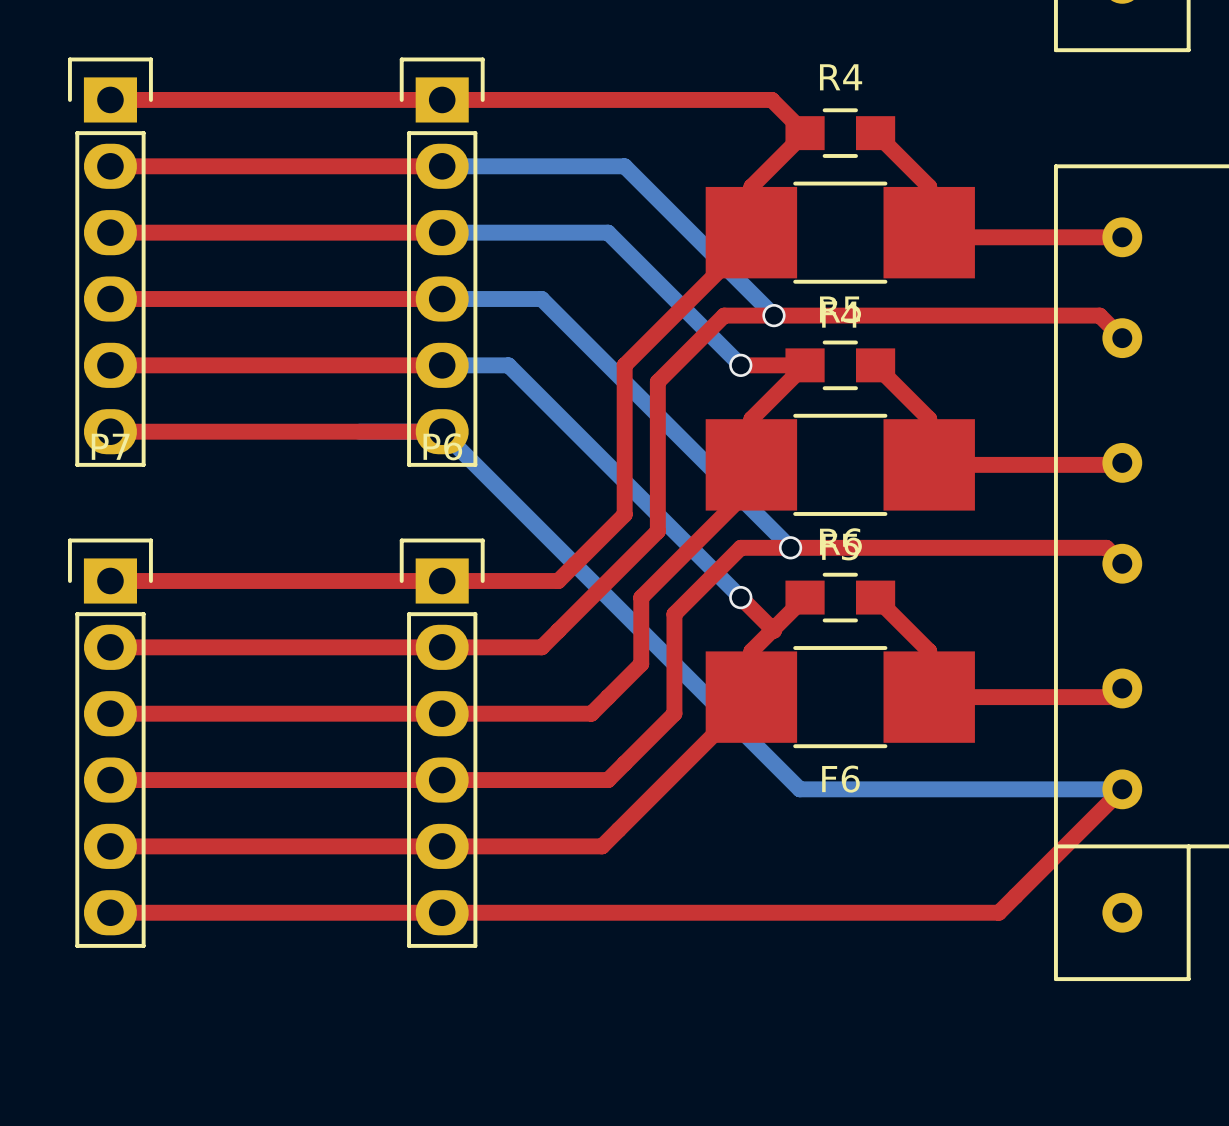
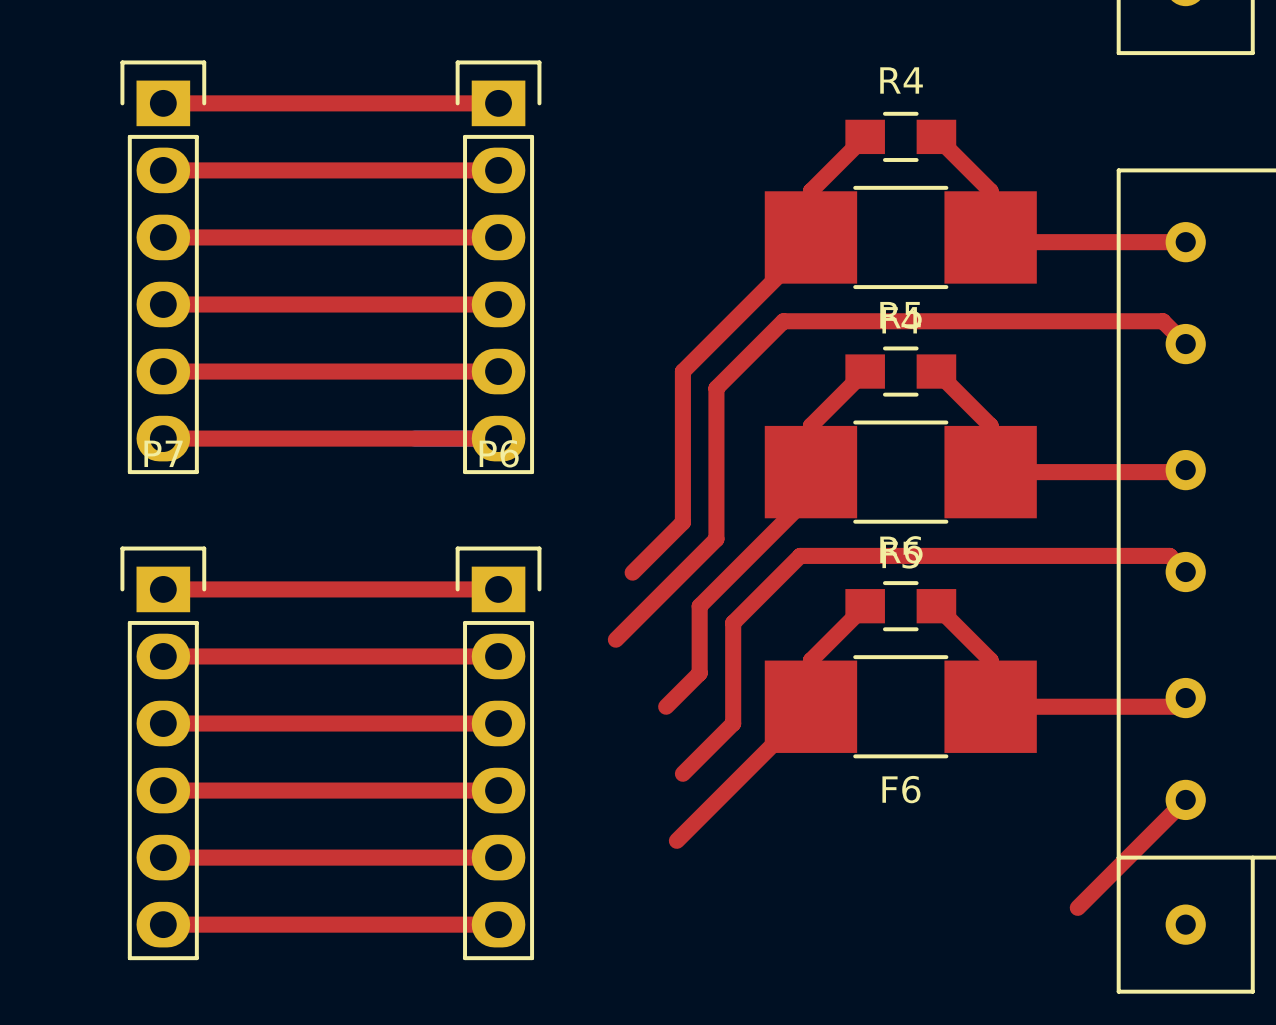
top track: (442, 99) (771, 99) (805, 133) -> none
bottom track: (442, 166) (624, 166) (773, 315) -> none
bottom track: (442, 232) (608, 232) (740, 365) -> none
bottom track: (442, 299) (541, 299) (790, 547) -> none
via: (773, 315) -> none
bottom track: (442, 365) (508, 365) (740, 597) -> none
top track: (740, 365) (805, 365) -> none
via: (740, 365) -> none
bottom track: (442, 431) (799, 789) (1122, 789) -> none
via: (790, 547) -> none
top track: (574, 564) (558, 580) (442, 580) -> none
top track: (740, 597) (773, 630) (773, 628) -> none
via: (740, 597) -> none
top track: (558, 630) (541, 647) (442, 647) -> none
top track: (608, 697) (591, 713) (442, 713) -> none
top track: (624, 763) (608, 780) (442, 780) -> none
top track: (618, 829) (602, 846) (442, 846) -> none
top track: (1015, 896) (998, 912) (442, 912) -> none

